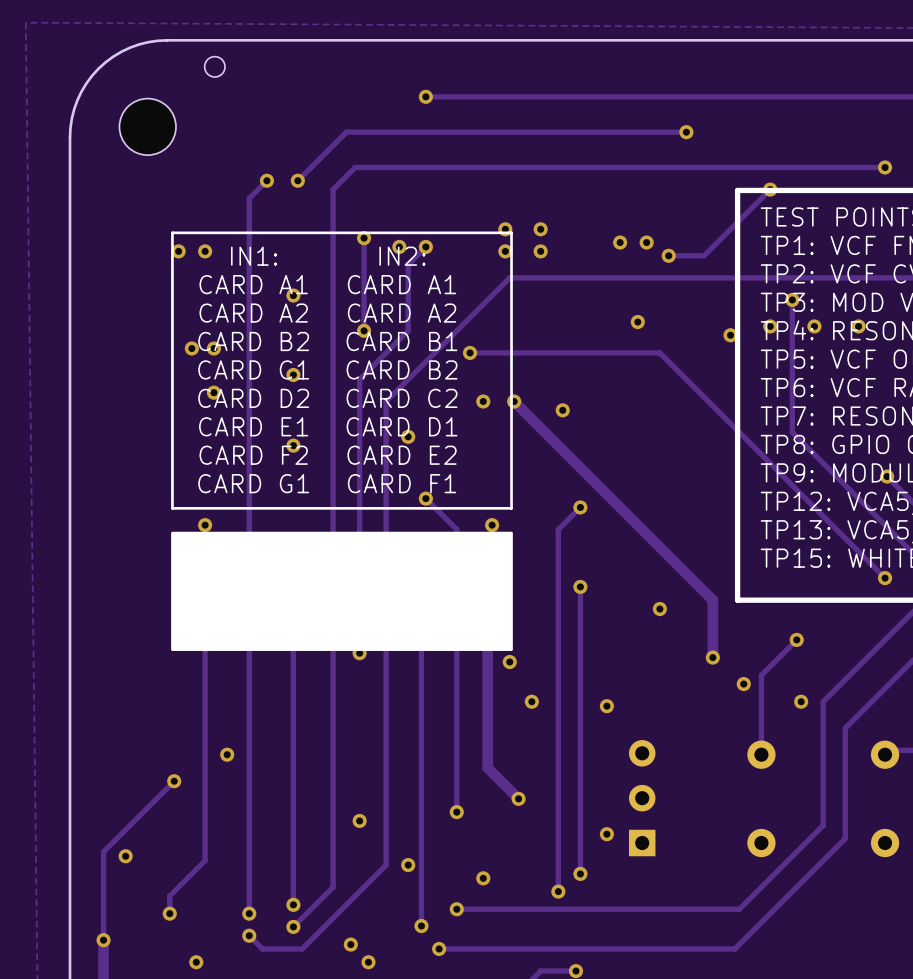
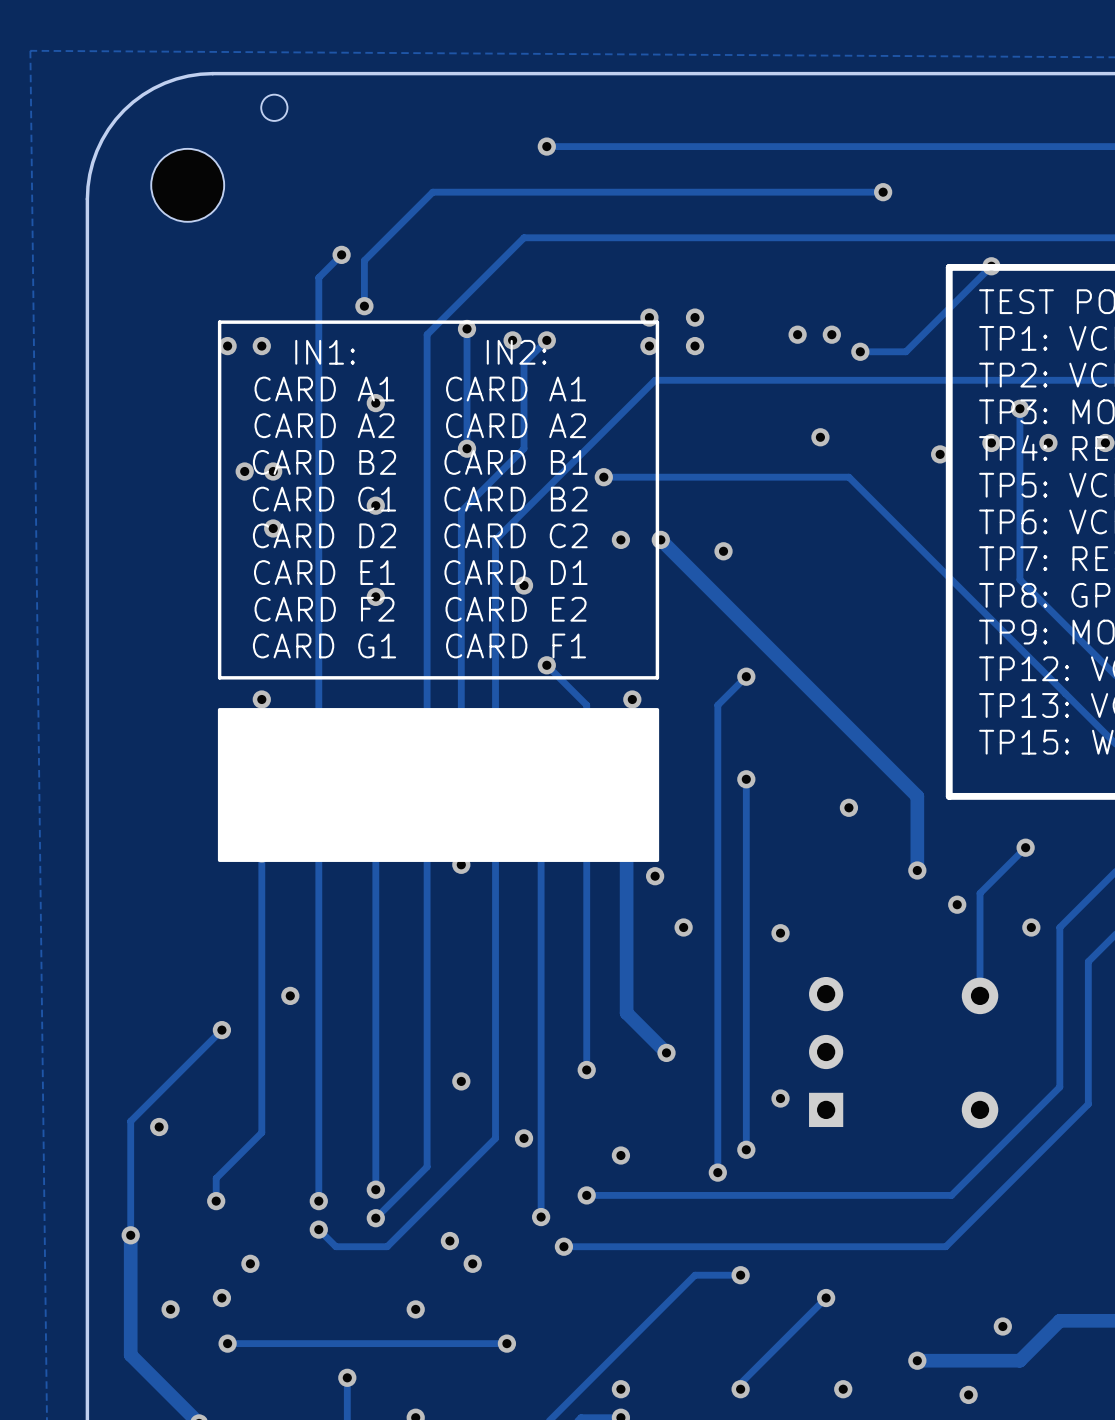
track: (346, 132) (297, 180) -> (444, 192) (432, 192) (364, 260) (364, 306)
track: (408, 167) (355, 167) (333, 189) (333, 242) -> (524, 237) (427, 334)
via position: (297, 180) -> (364, 306)

